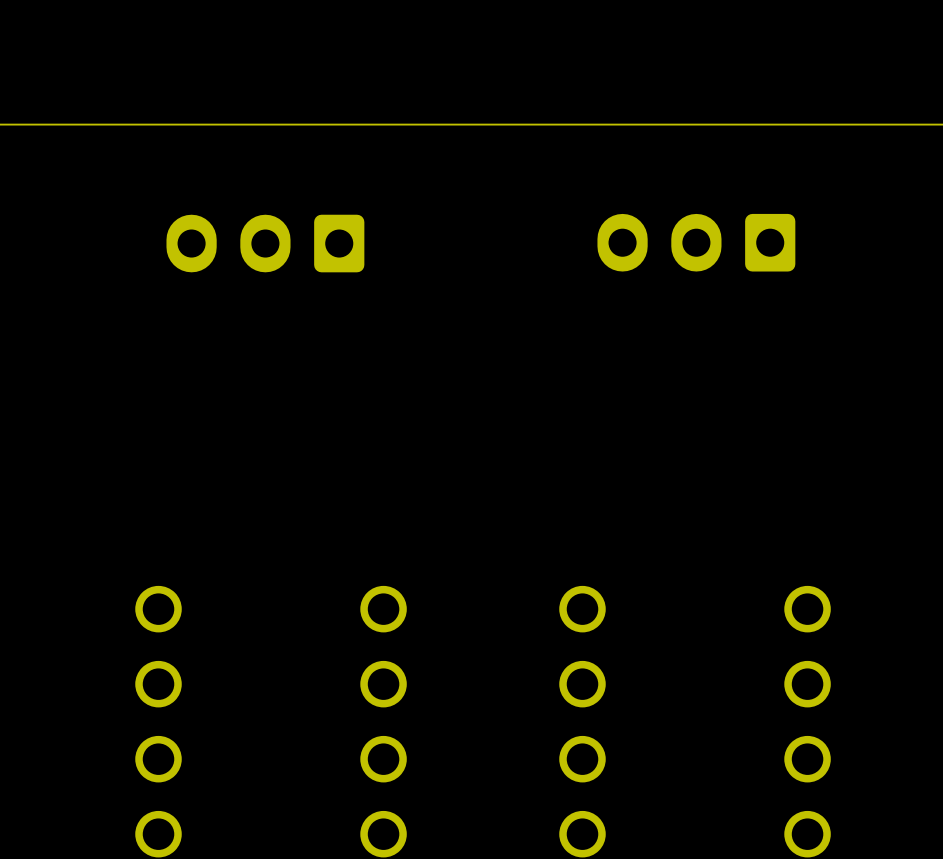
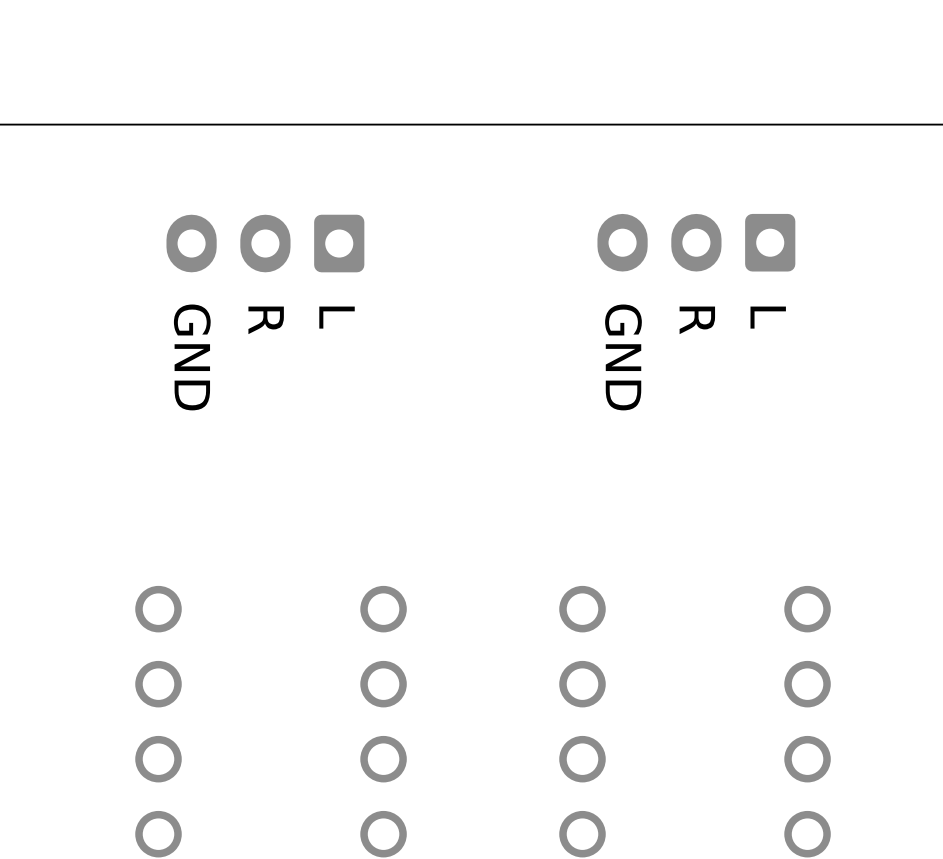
text: none -> L (337, 317)
text: none -> L (768, 317)
text: none -> R (266, 320)
text: none -> R (697, 320)
text: none -> GND (192, 357)
text: none -> GND (623, 357)

